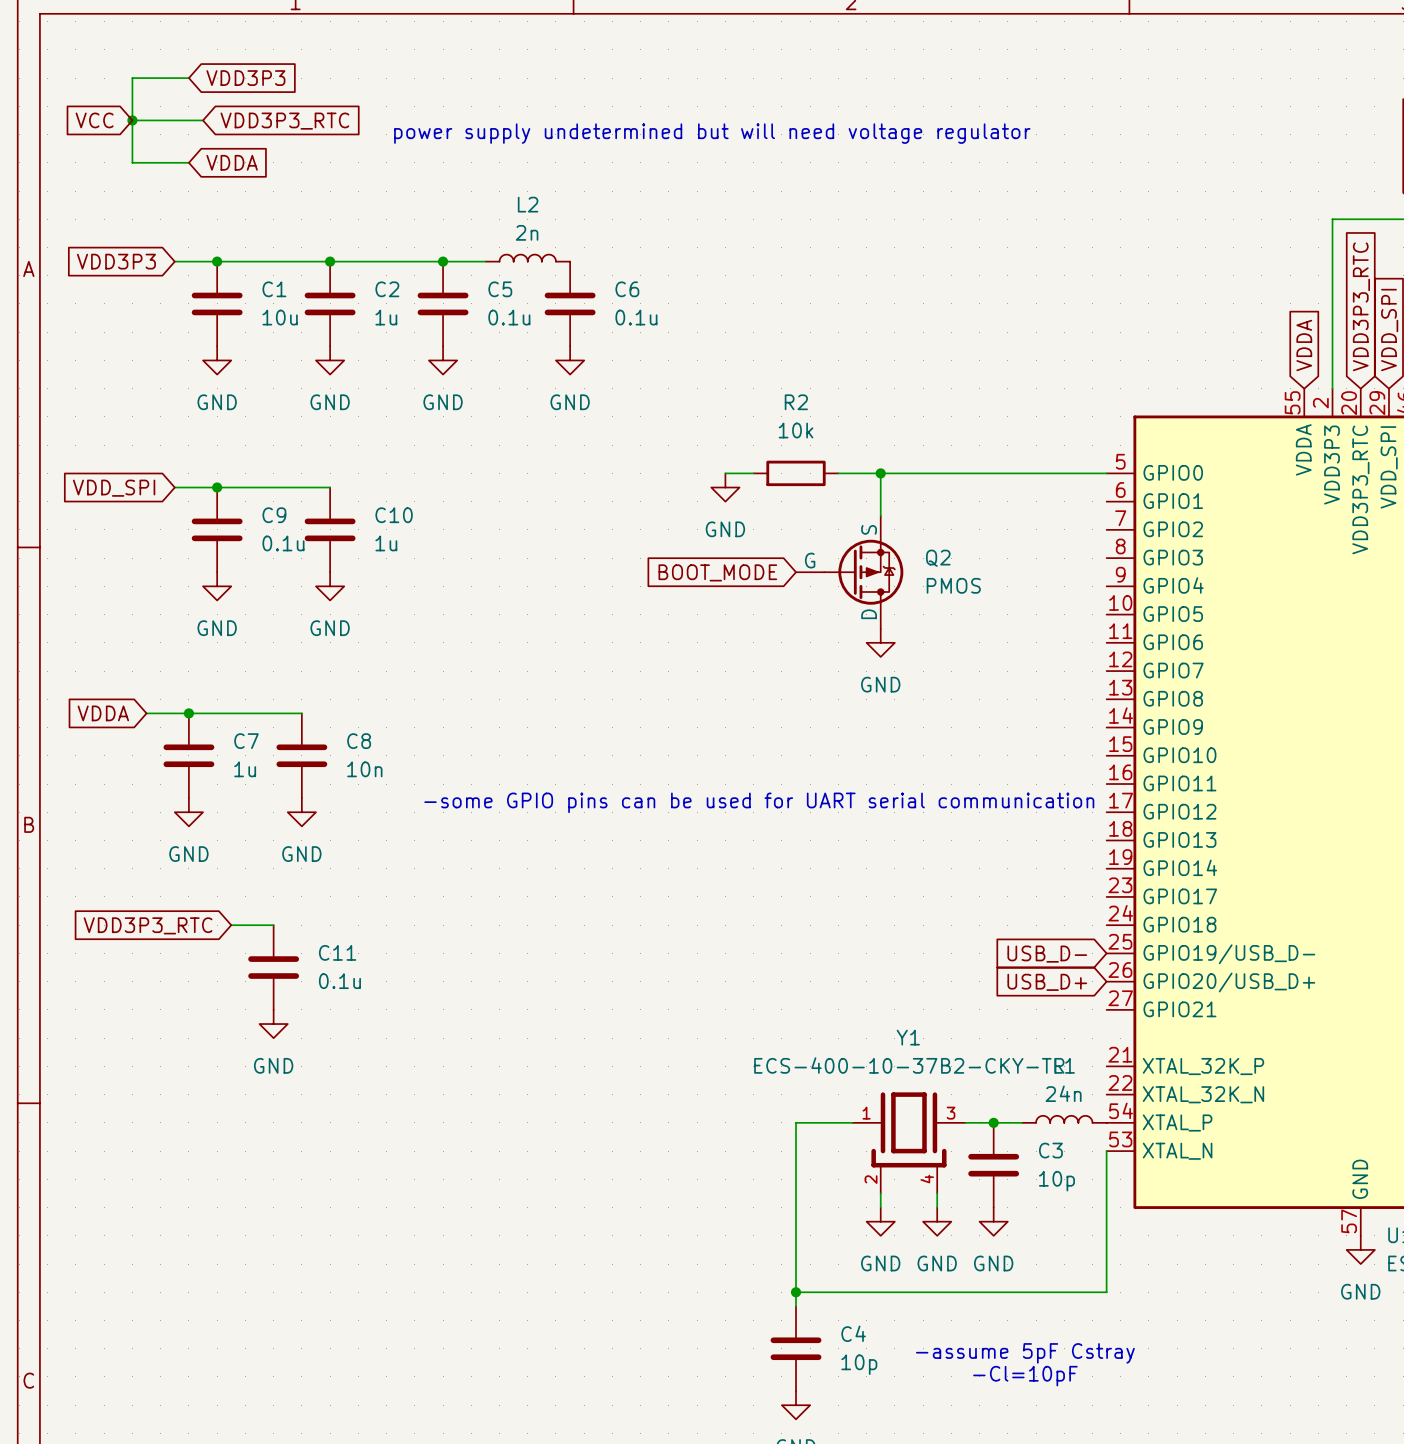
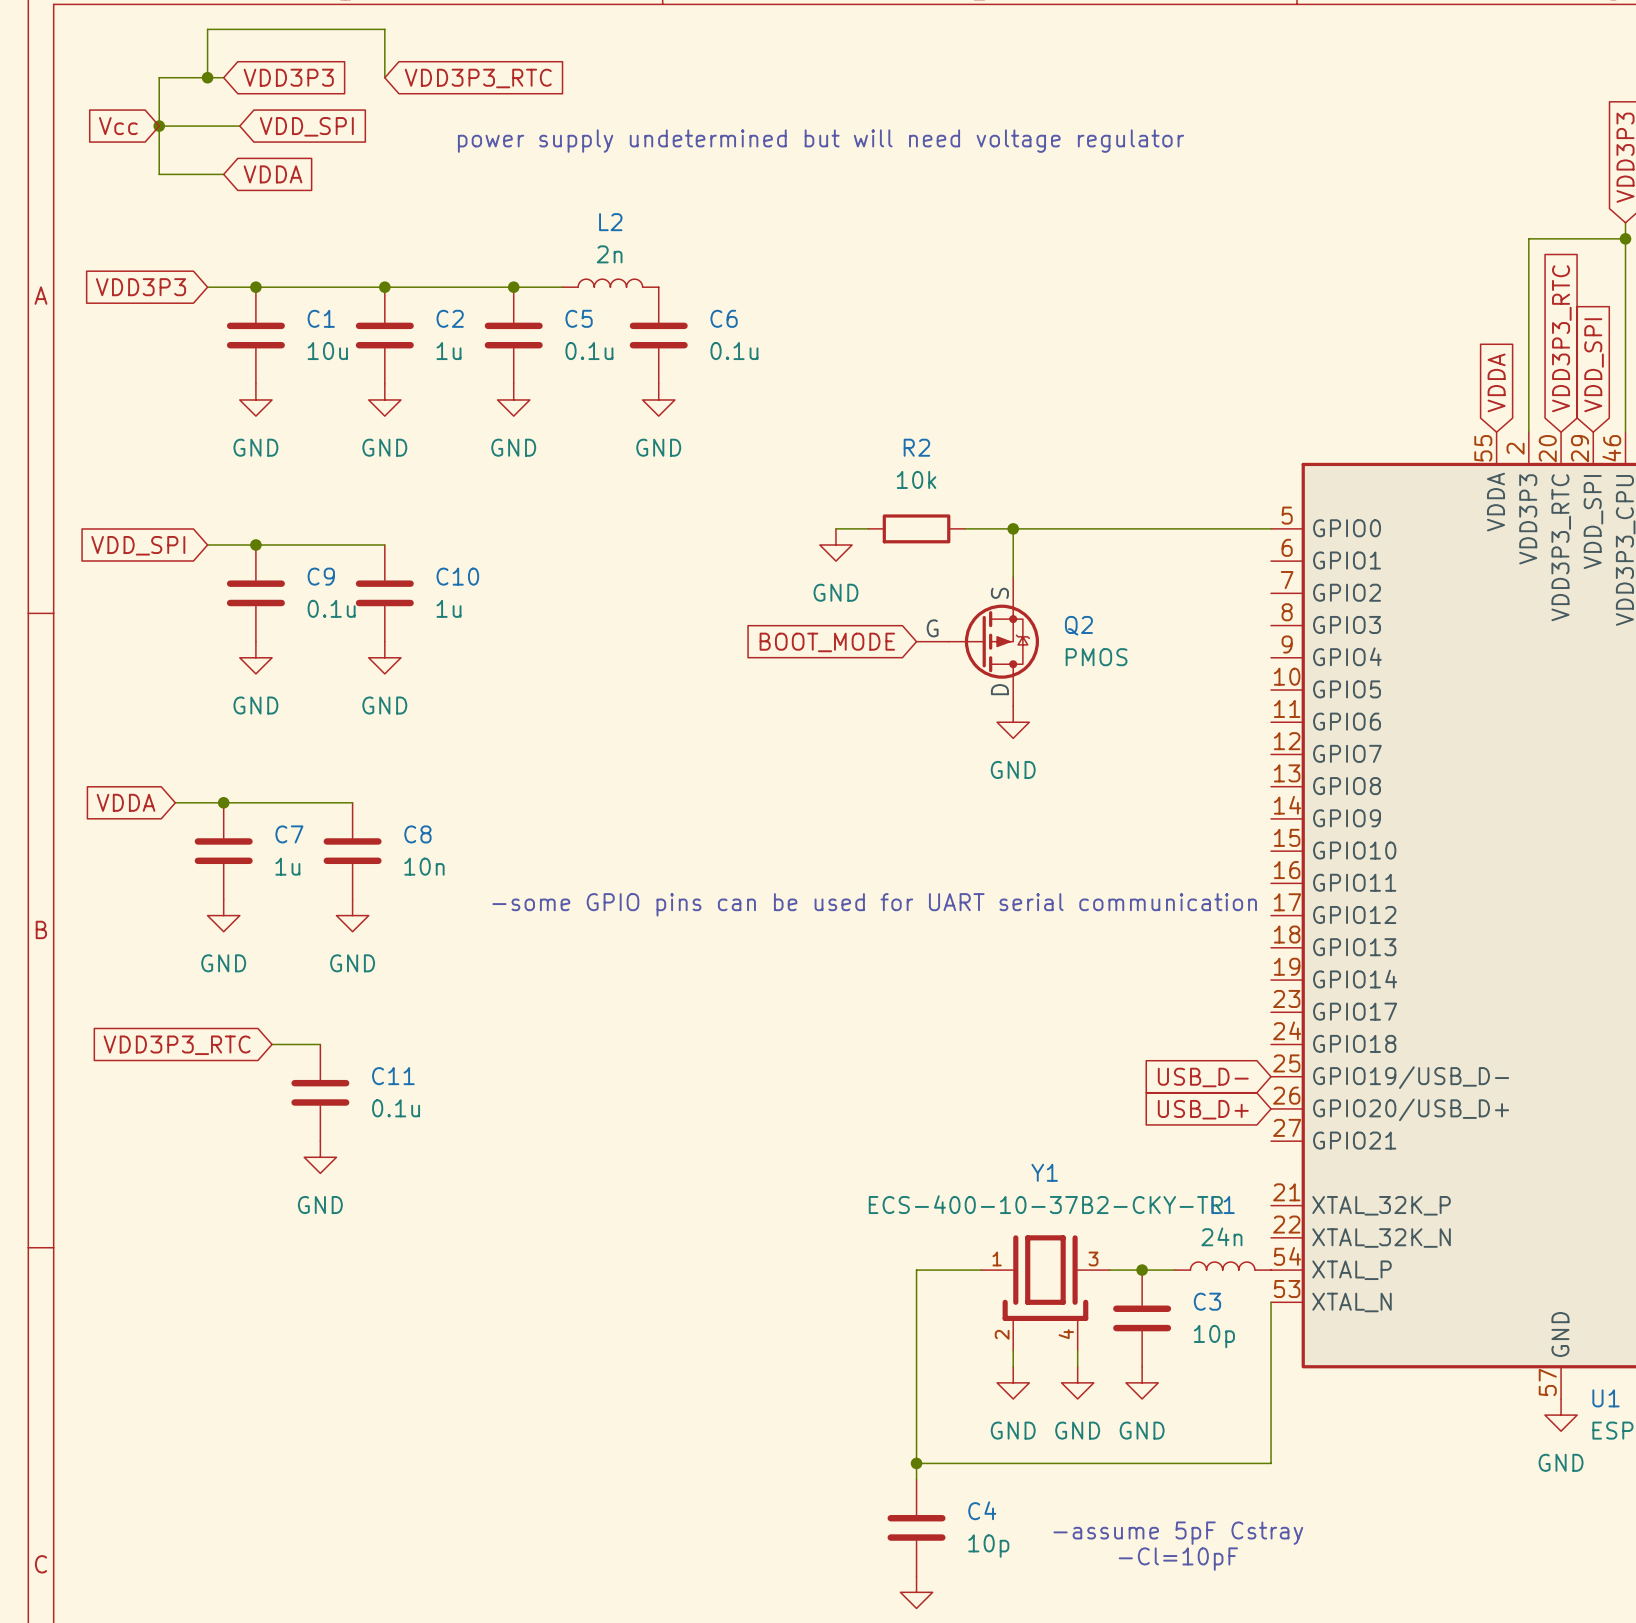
wire: none -> (207, 77) (207, 29) (384, 29) (384, 77)
junction: none -> (207, 77)
global label: none -> VDD3P3_RTC (478, 78)
global label: VCC (94, 120) -> Vcc (118, 126)
global label: VDD3P3_RTC (284, 121) -> VDD_SPI (306, 126)

